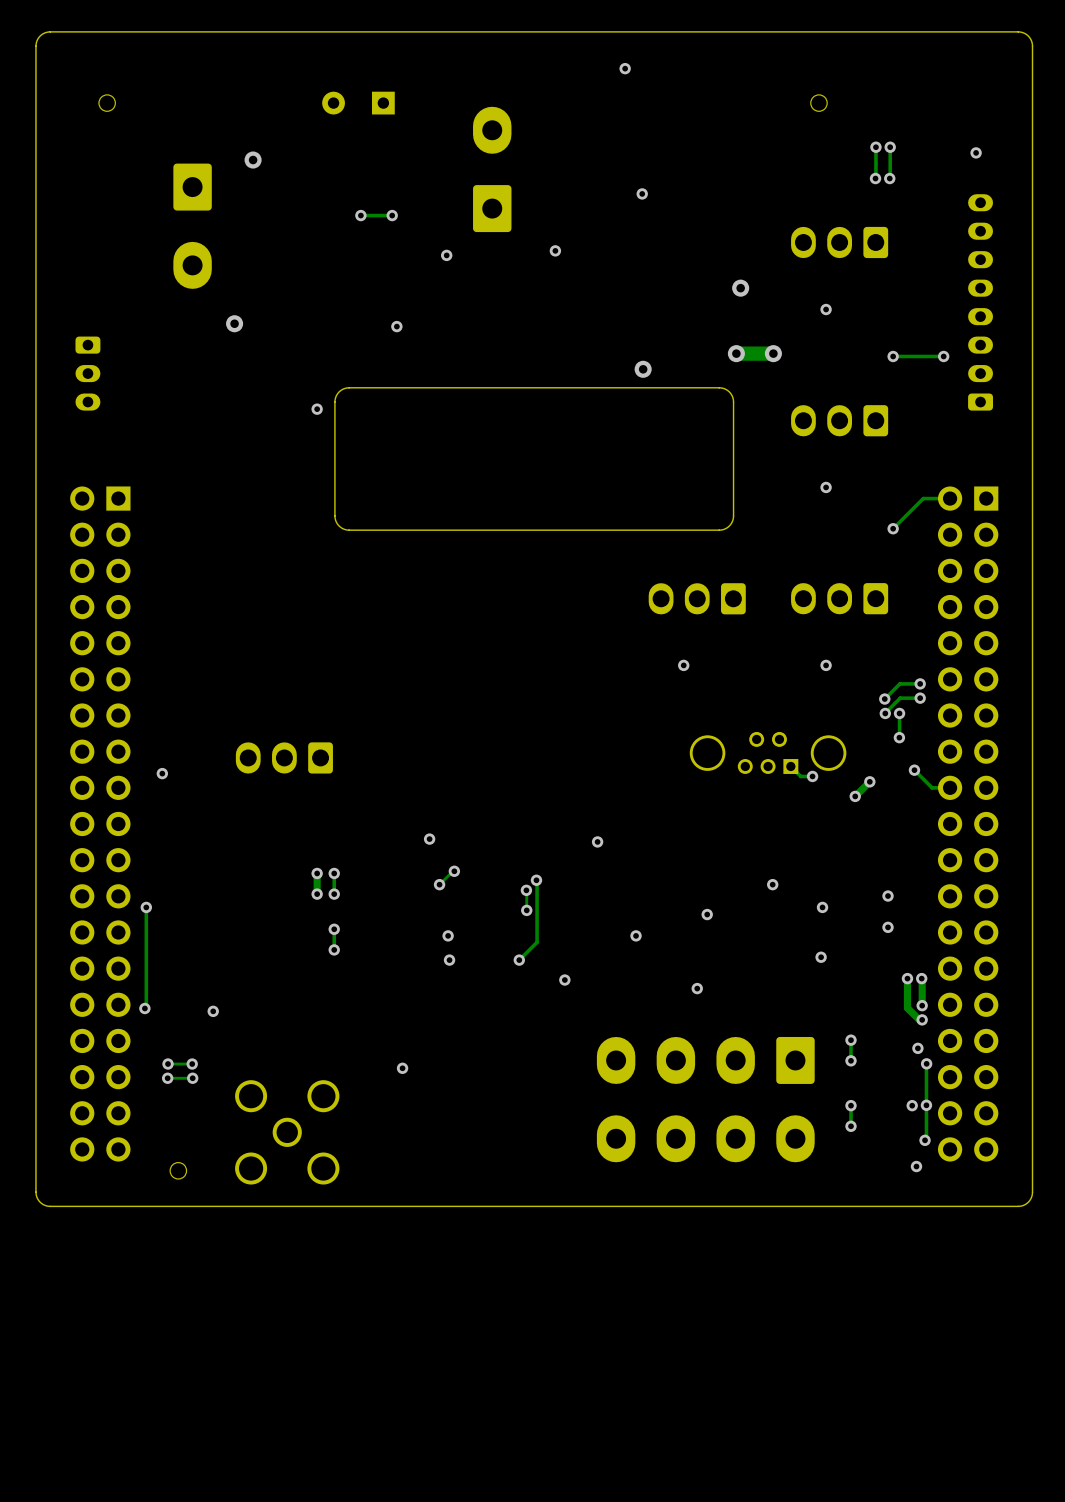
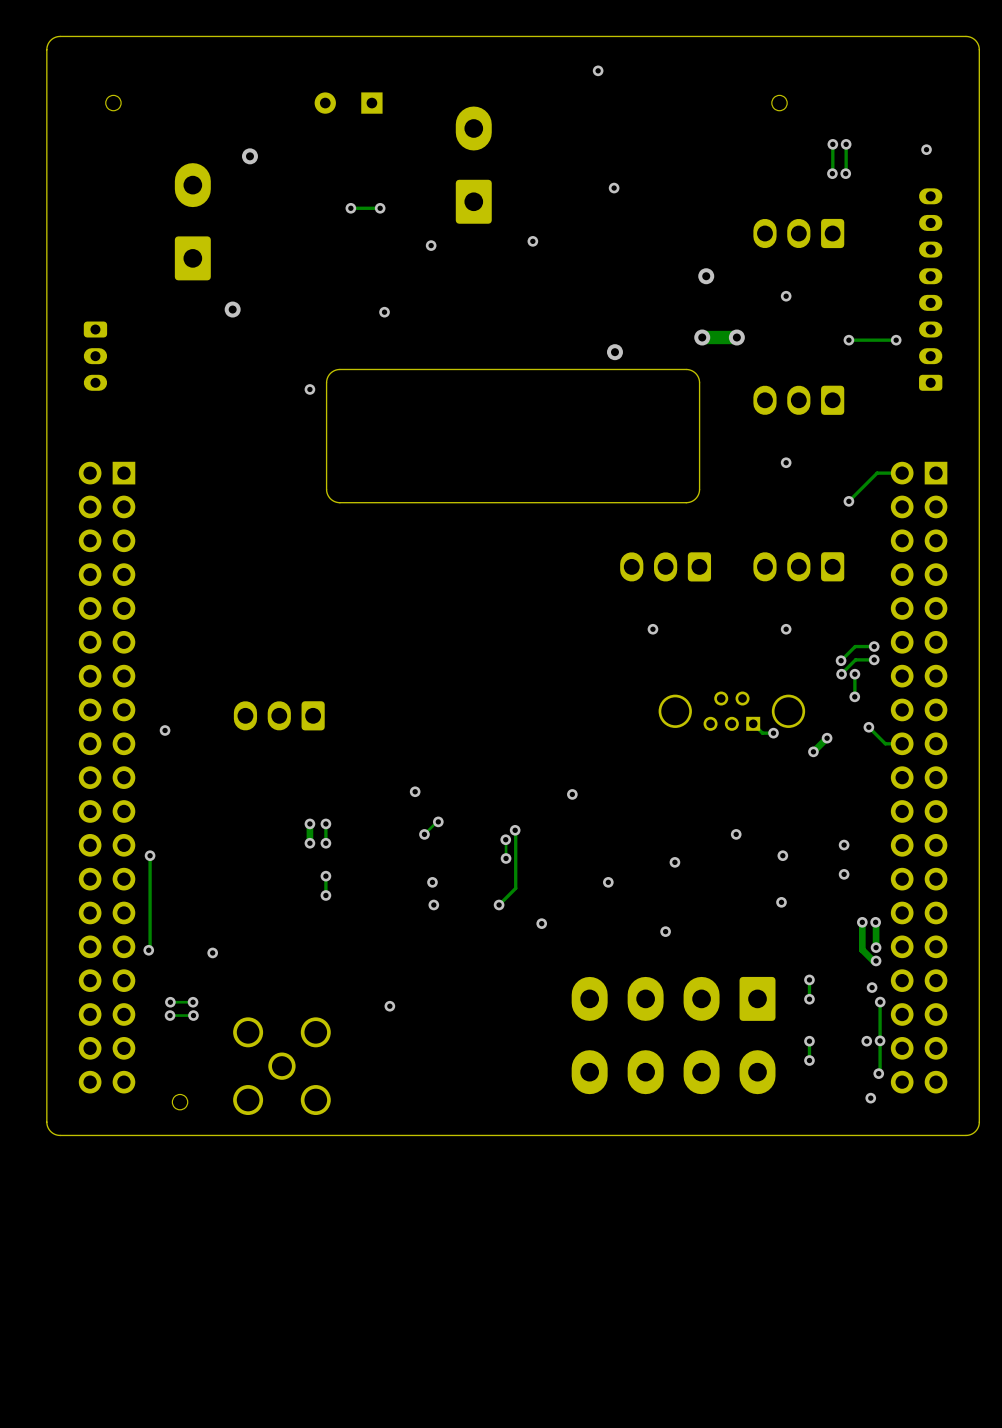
part rotation: 0° (192, 226) -> 180° (192, 221)

